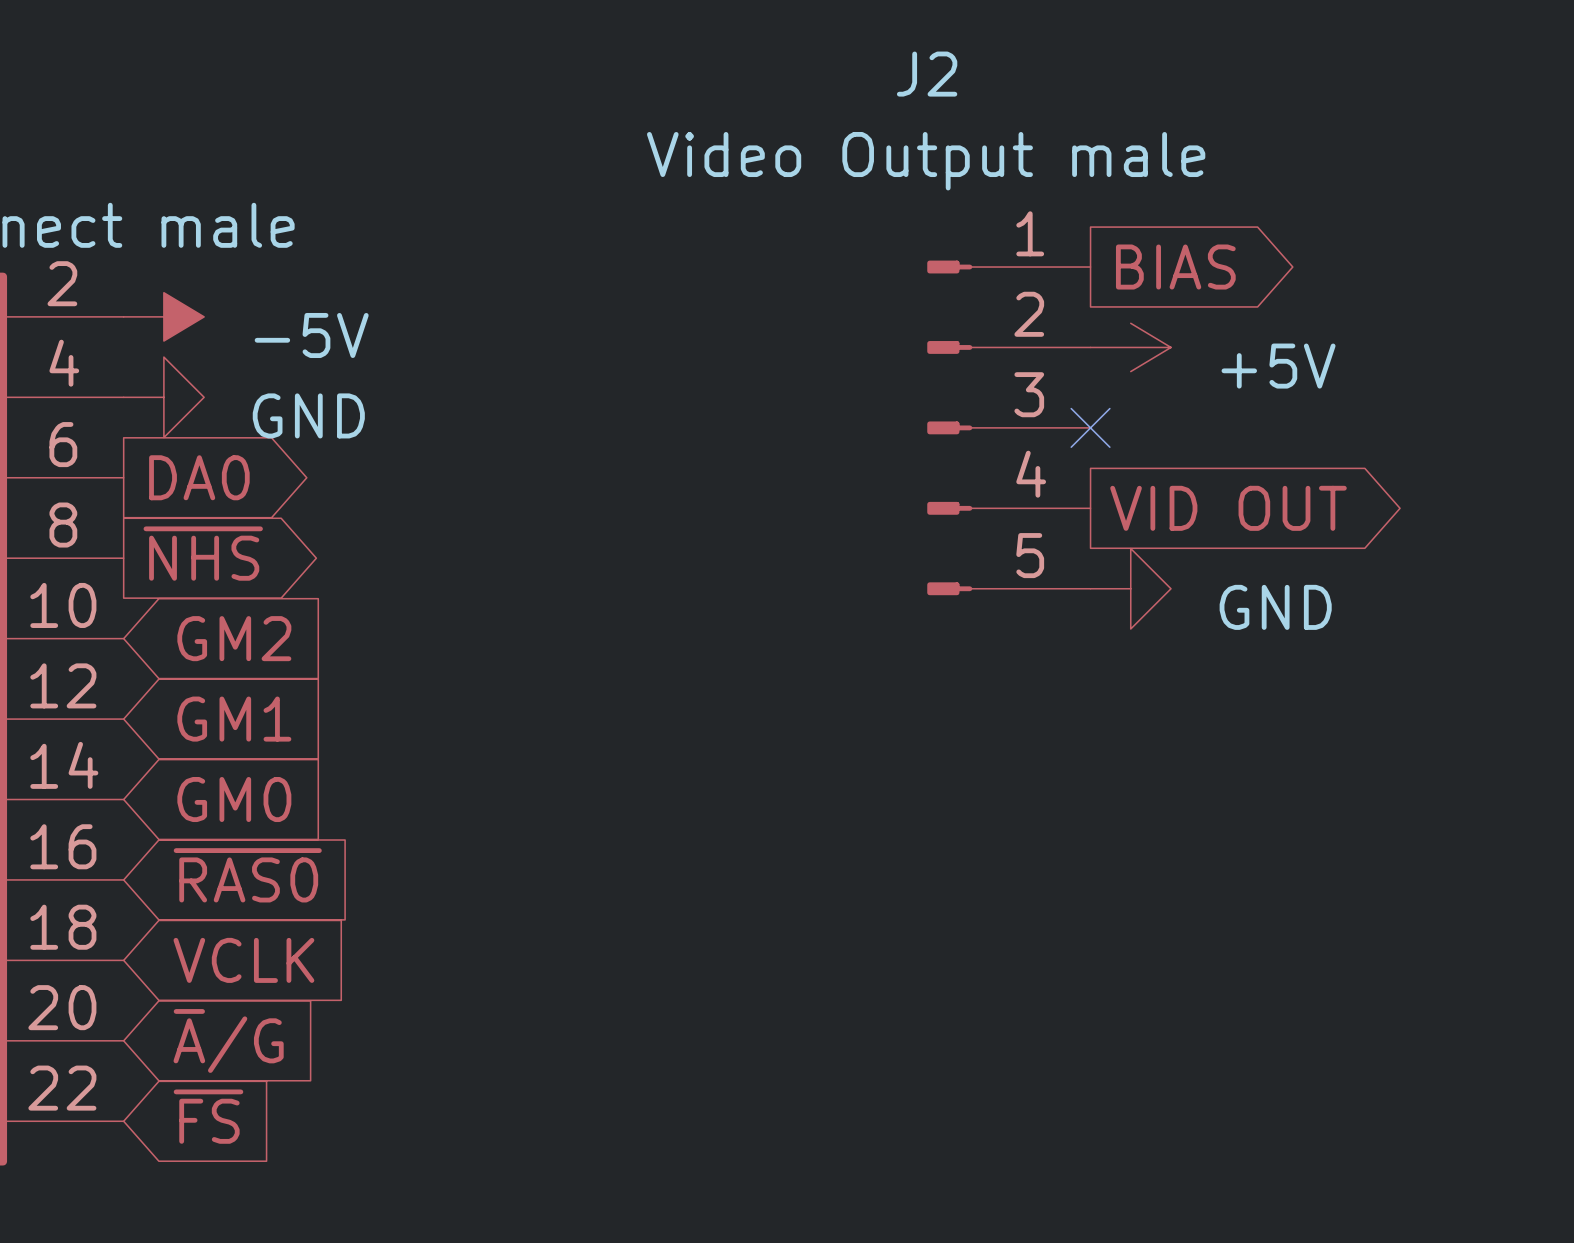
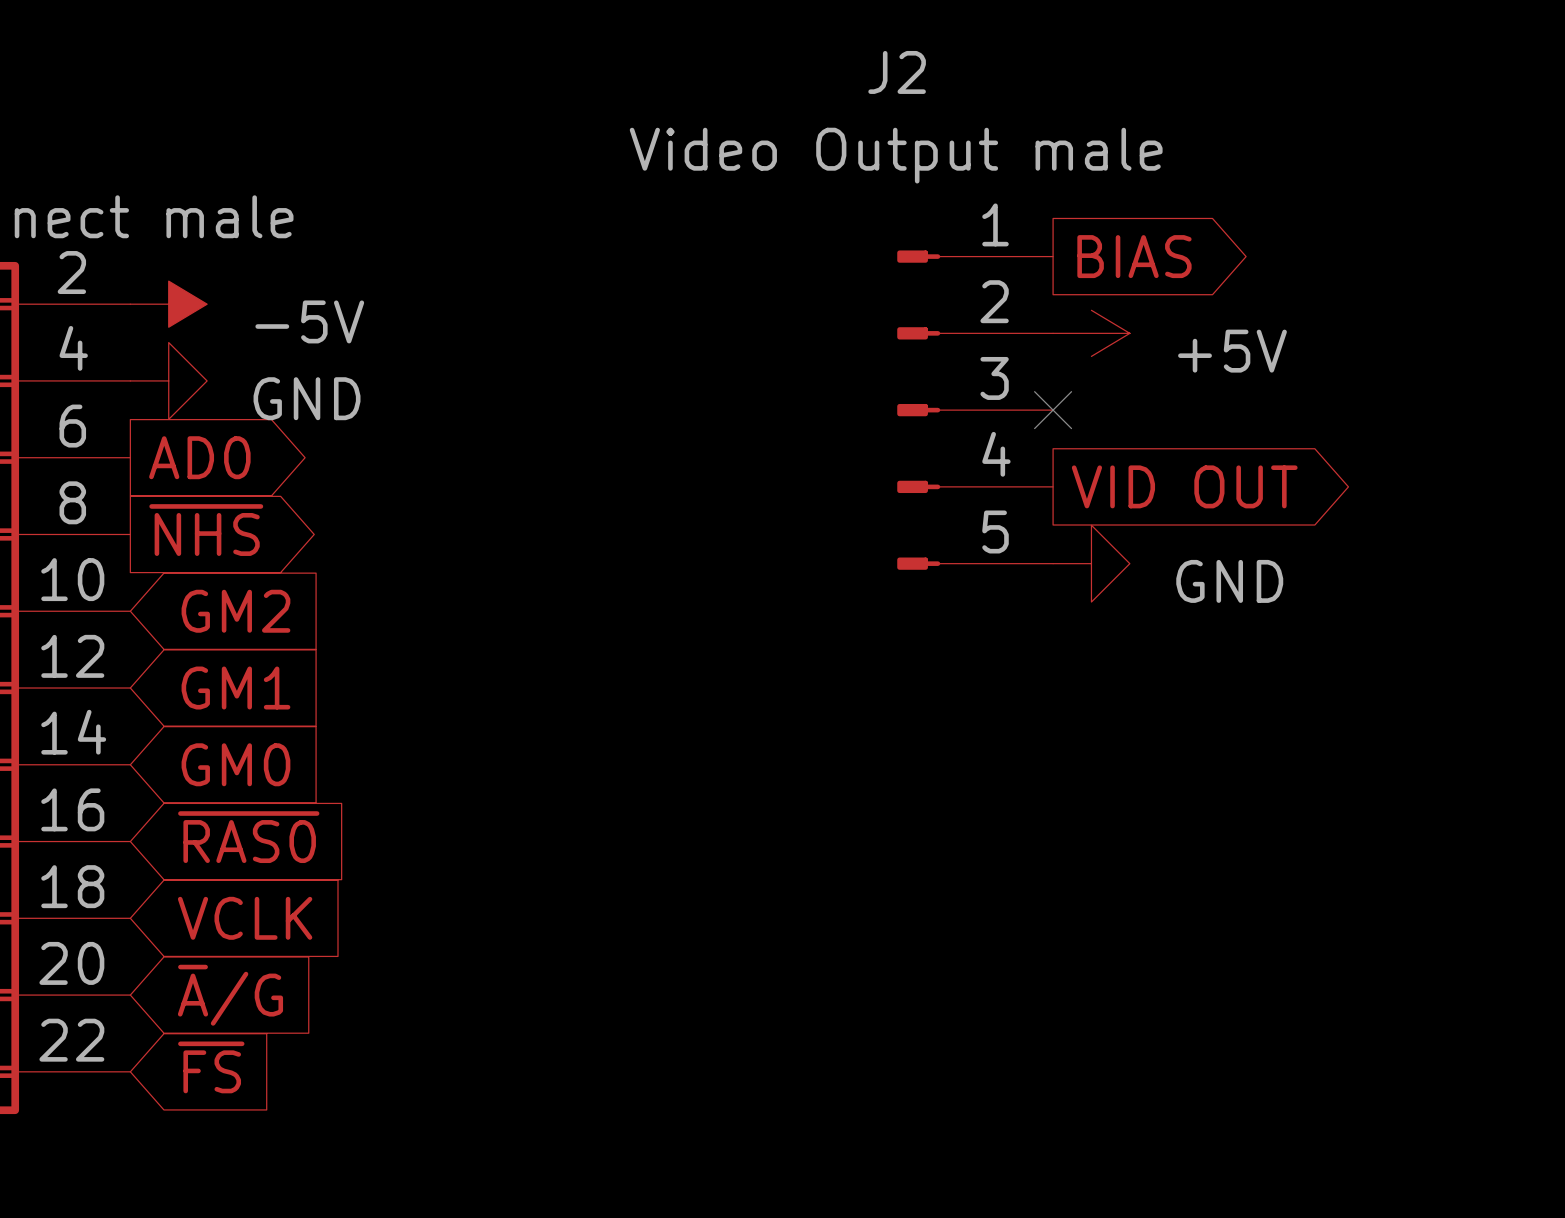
global label: DA0 (199, 477) -> AD0 (199, 457)

